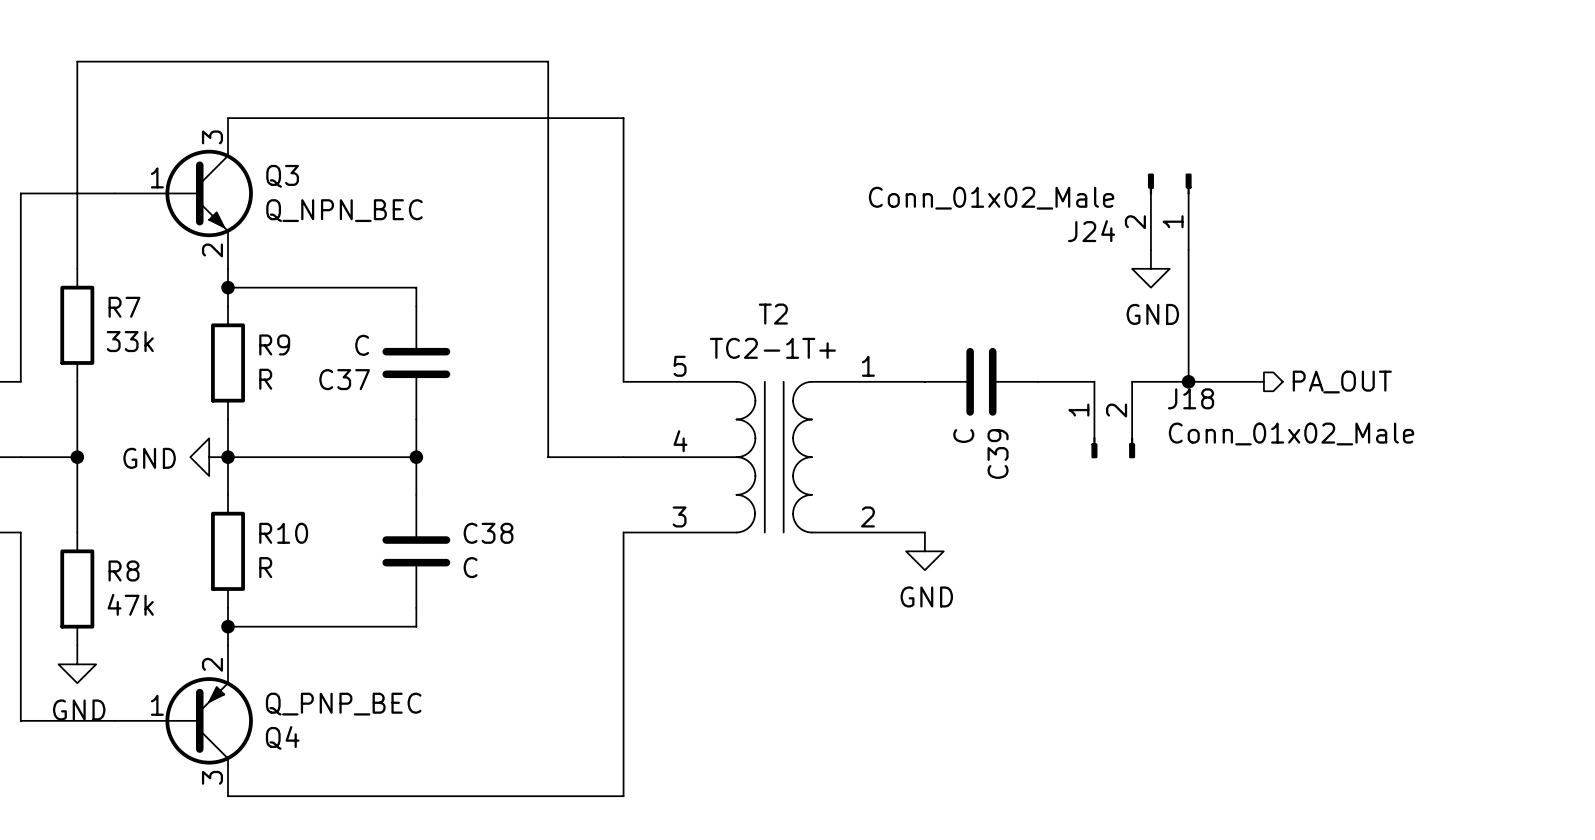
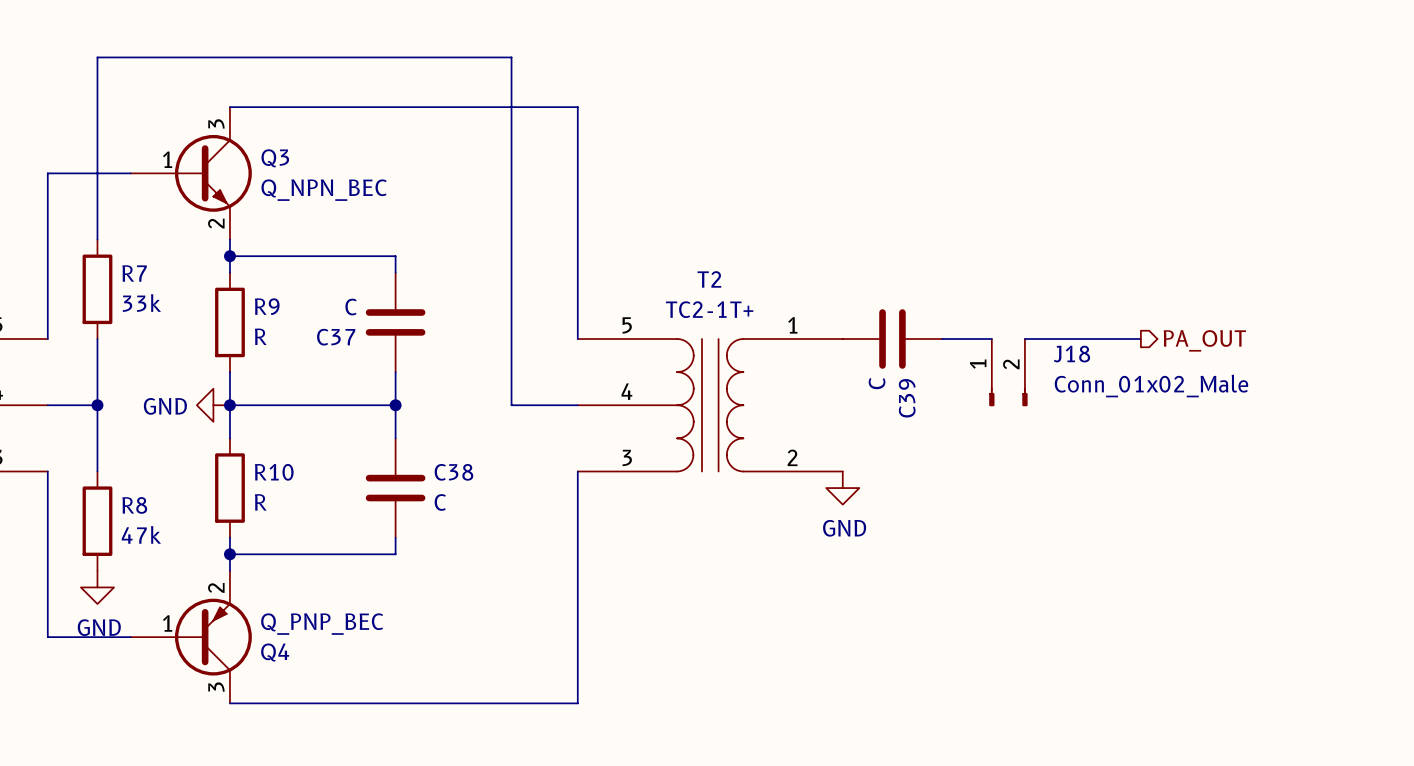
J24: Conn_01x02_Male (1169, 211) -> none
wire: (1188, 249) (1188, 381) -> none
power symbol: GND (1150, 268) -> none
junction: (1188, 381) -> none

